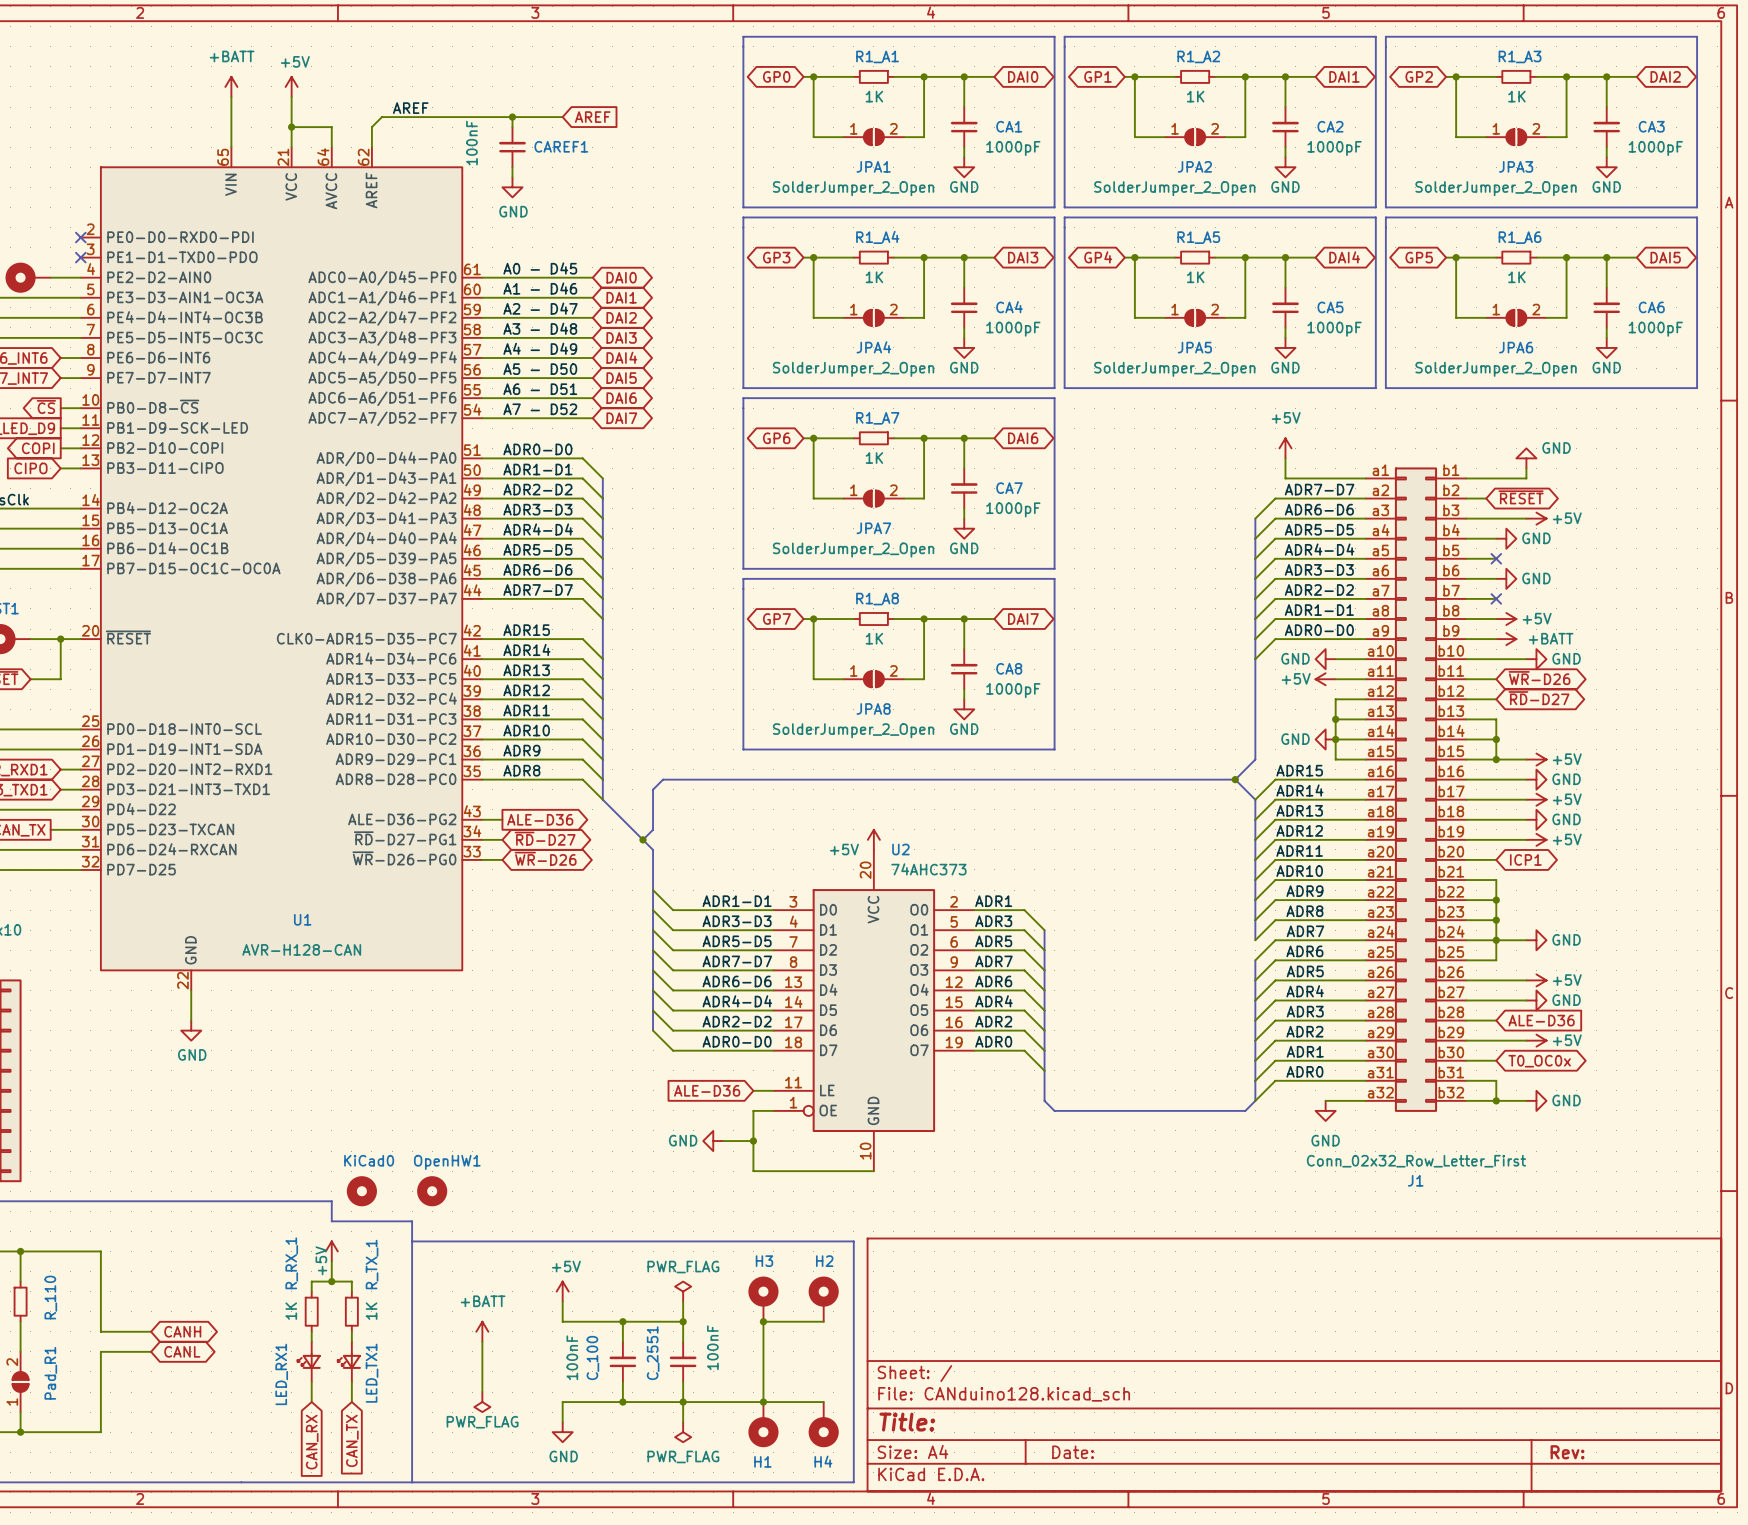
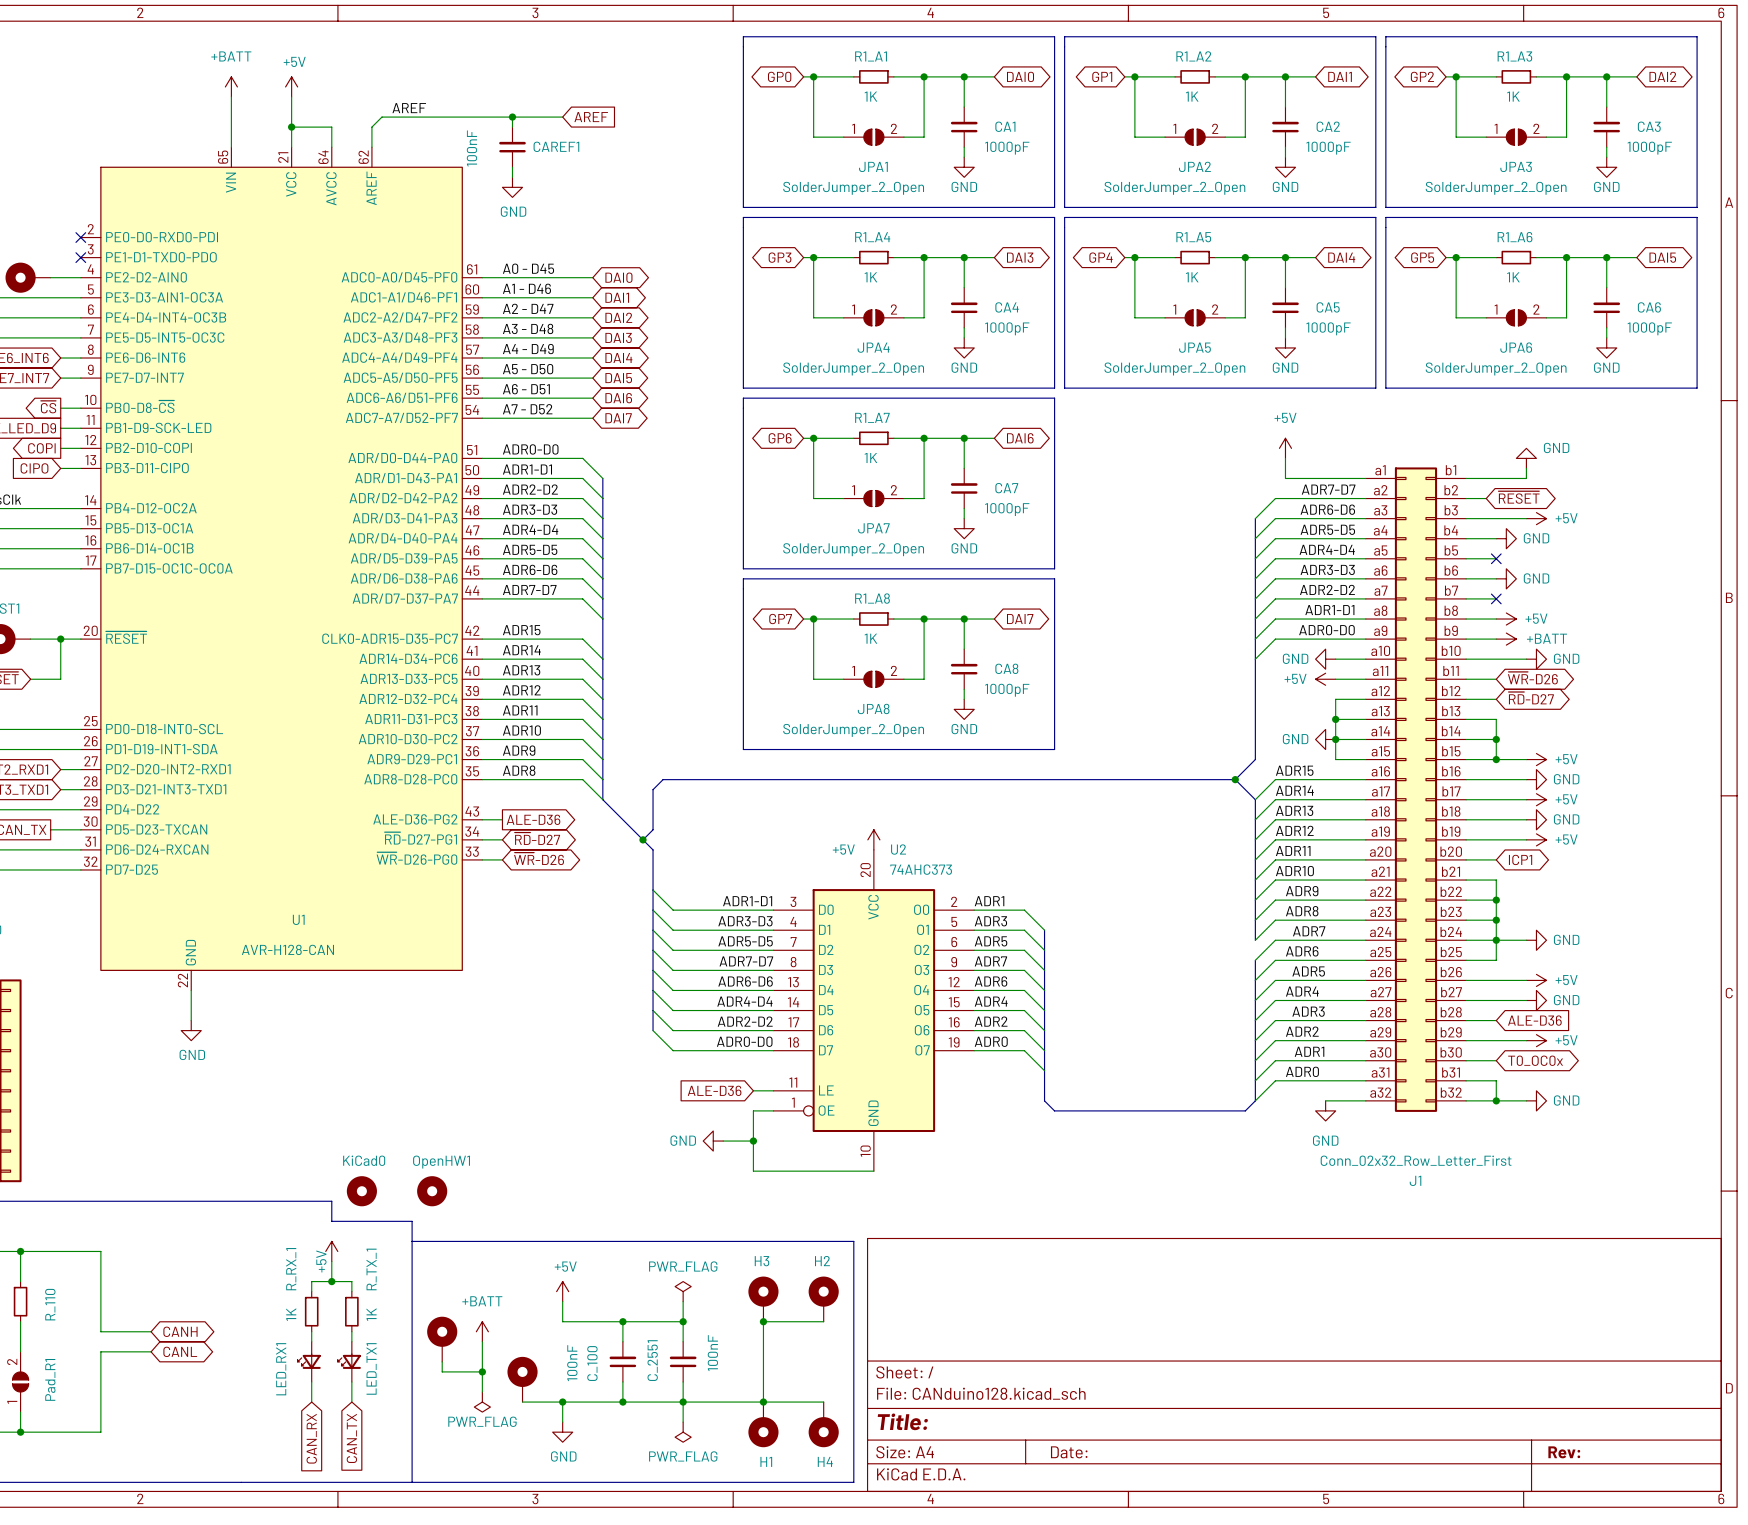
part: none -> (442, 1339)
wire: none -> (442, 1361) (442, 1371) (482, 1371)
junction: none -> (482, 1371)
part: none -> (522, 1379)
wire: none -> (522, 1402) (562, 1402)
junction: none -> (562, 1402)

